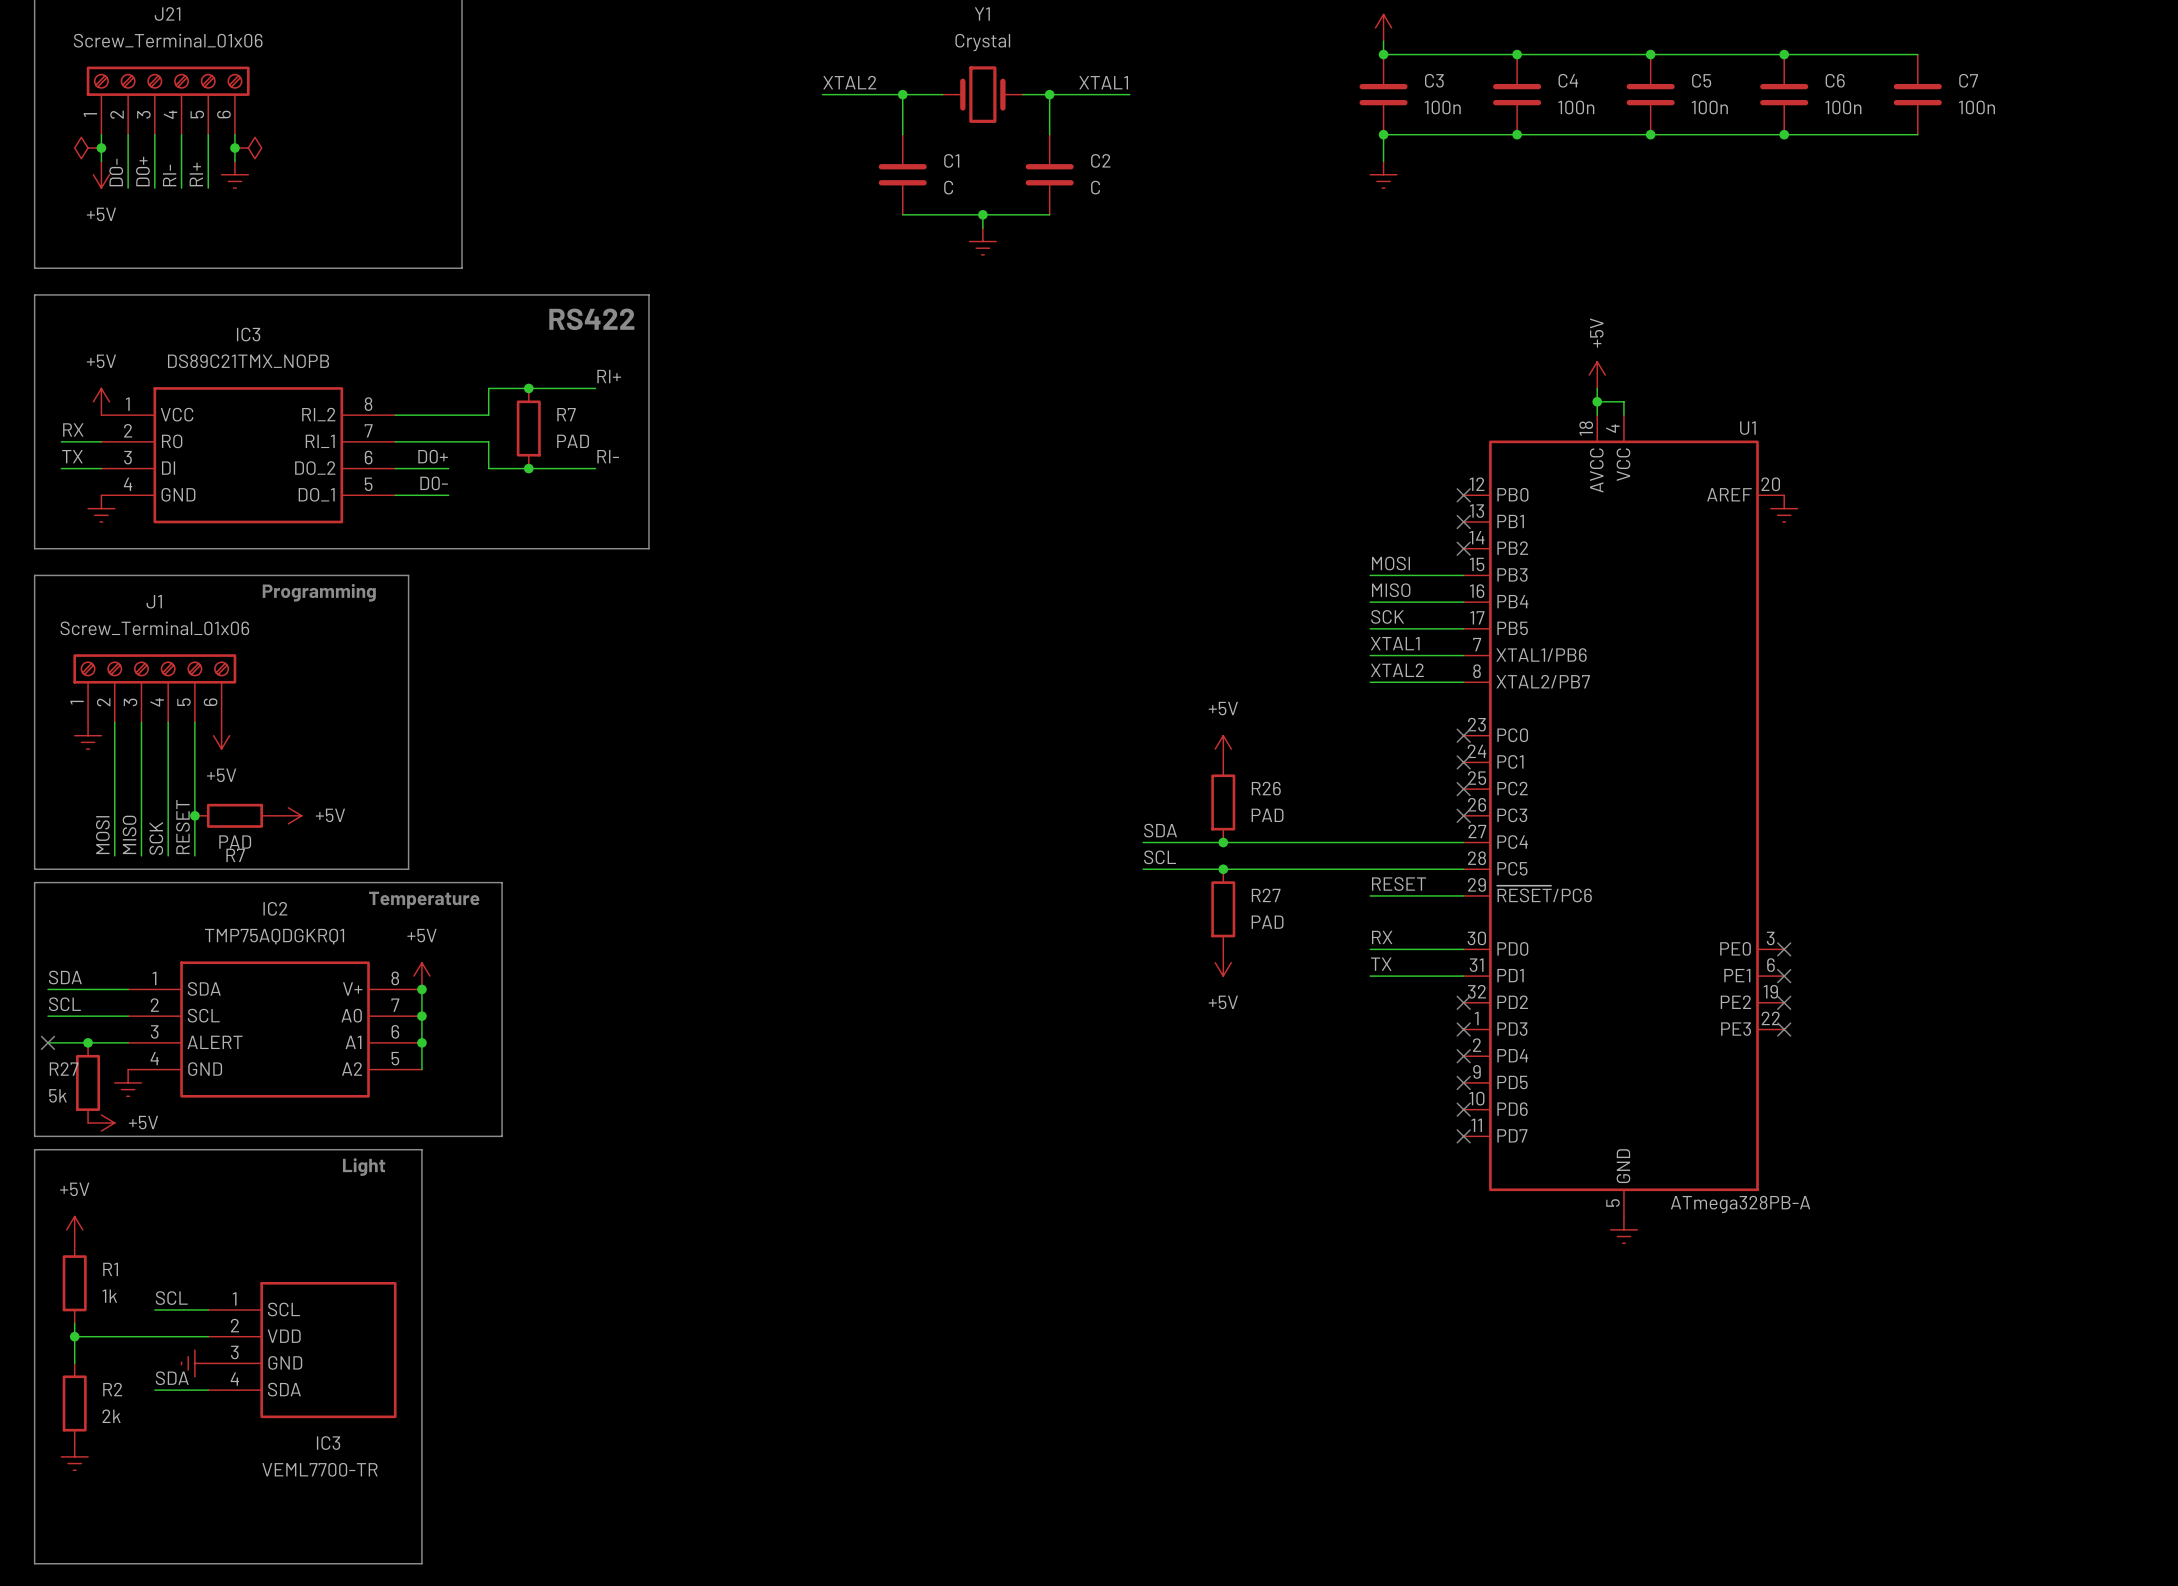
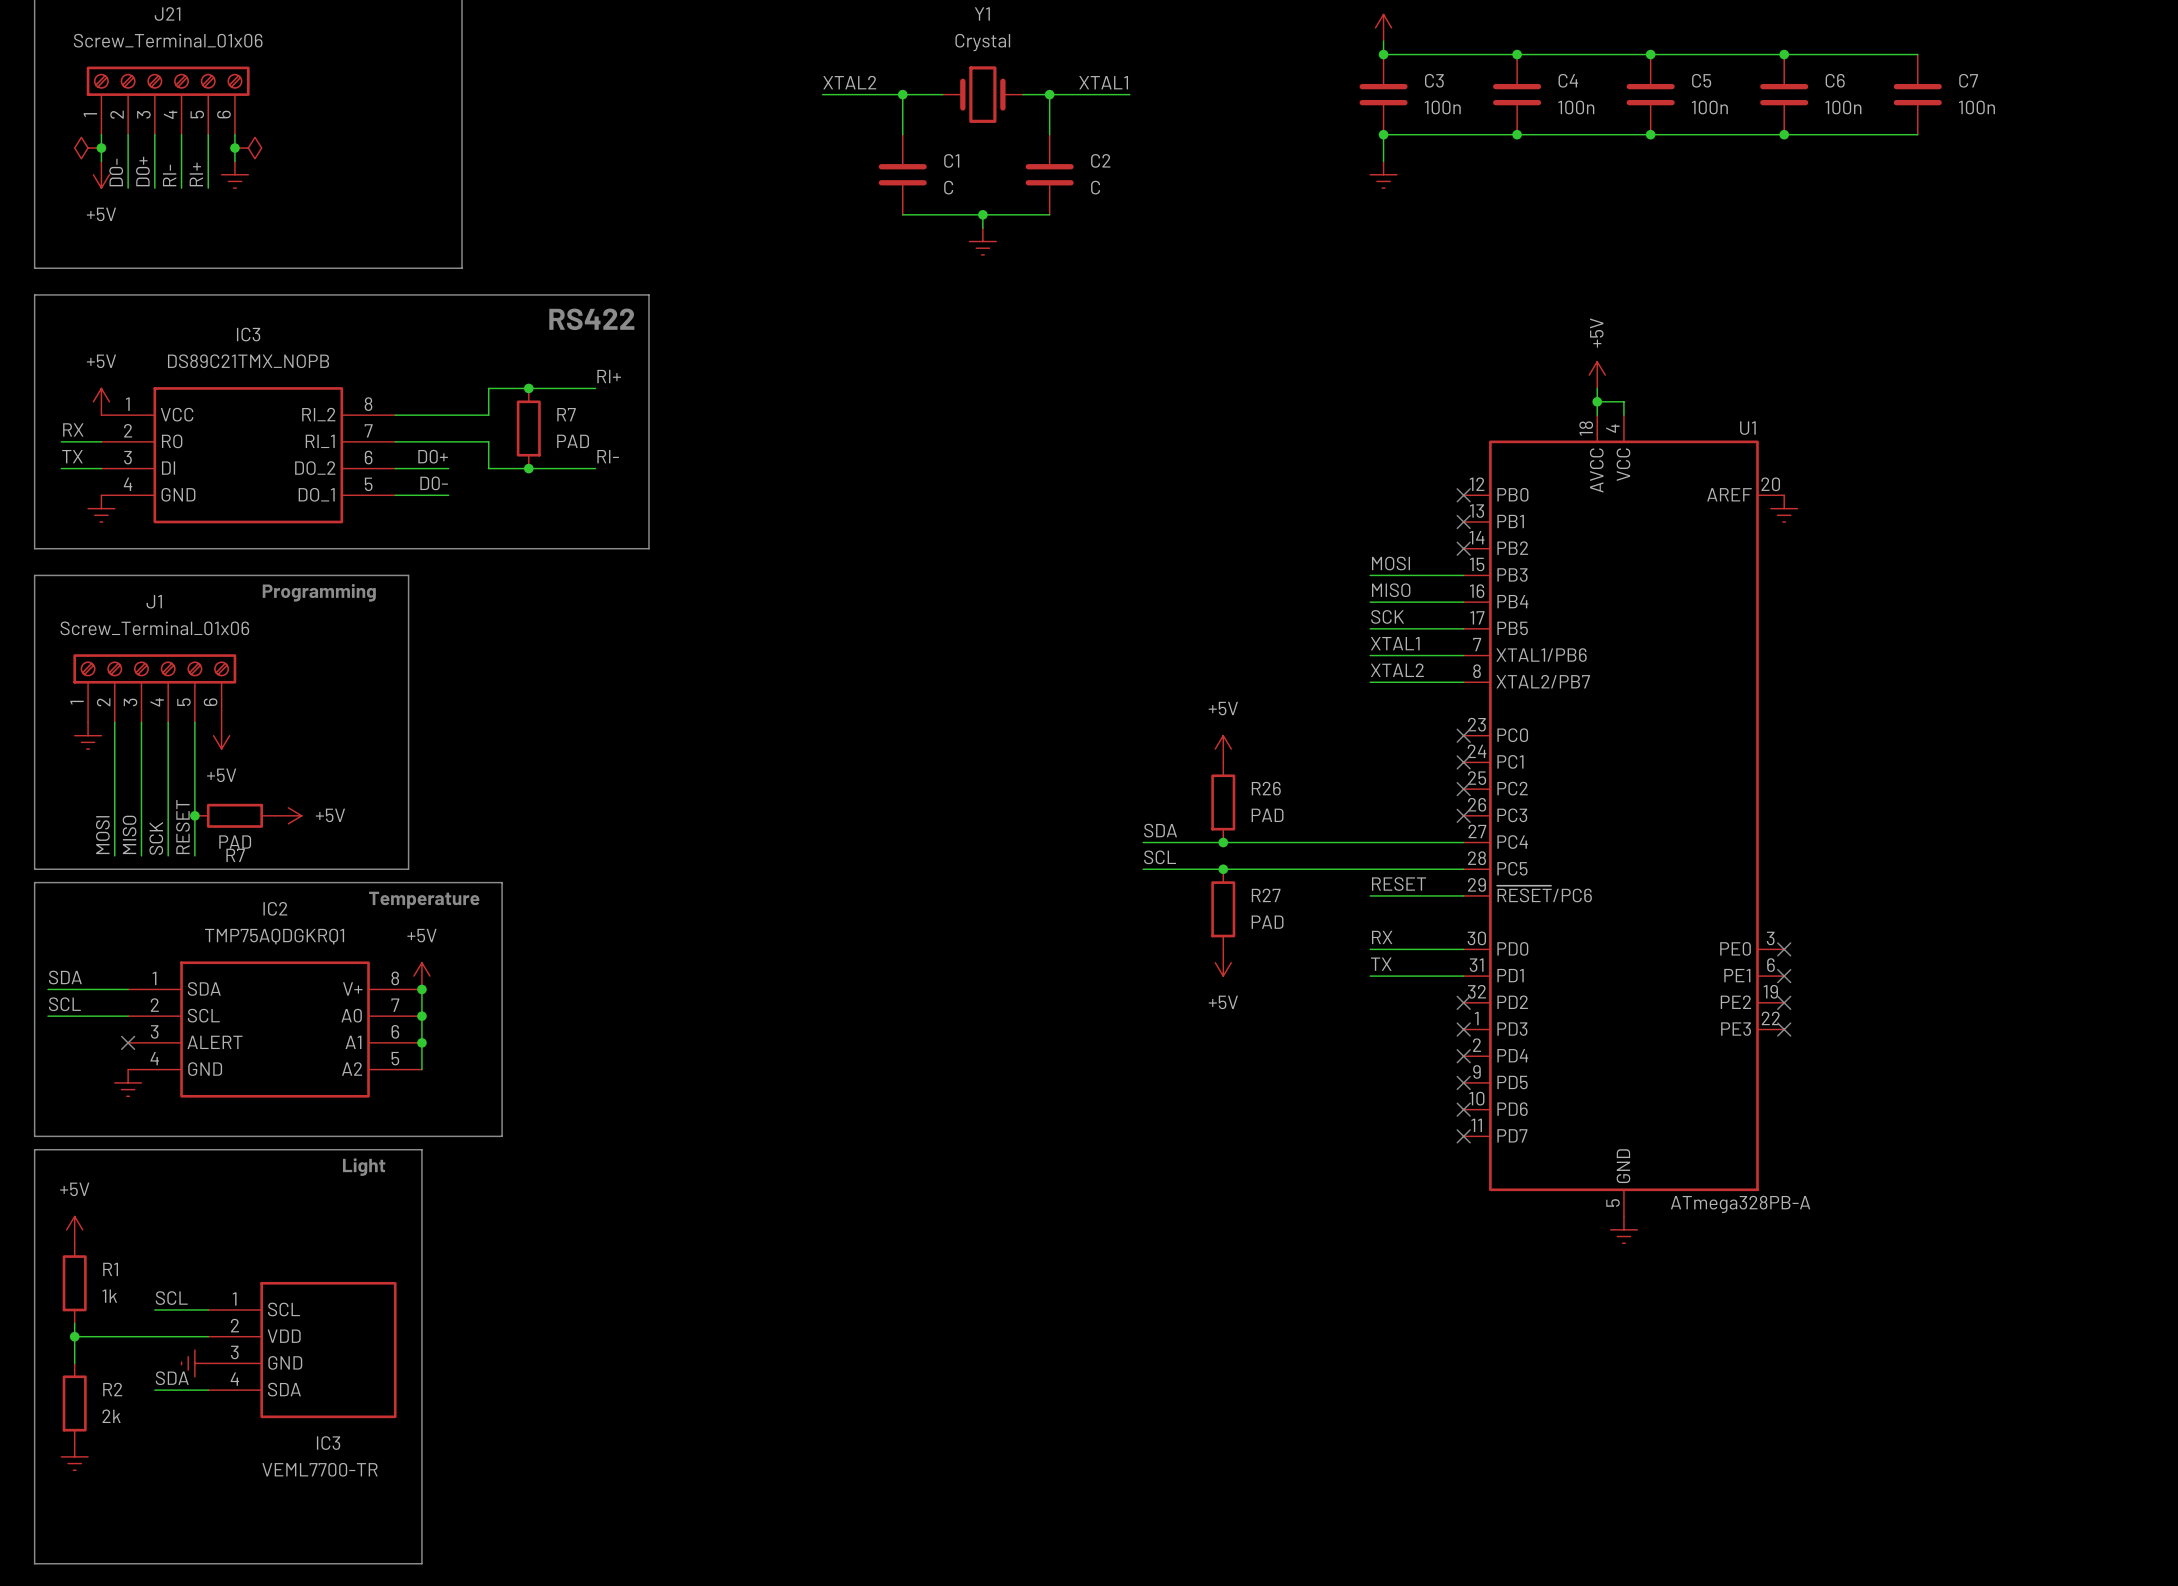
wire: (47, 1042) (128, 1042) -> none
no-connect mark: (47, 1042) -> none
junction: (88, 1042) -> none
no-connect mark: none -> (128, 1042)
R27: 5k (88, 1082) -> none
power symbol: +5V (101, 1123) -> none

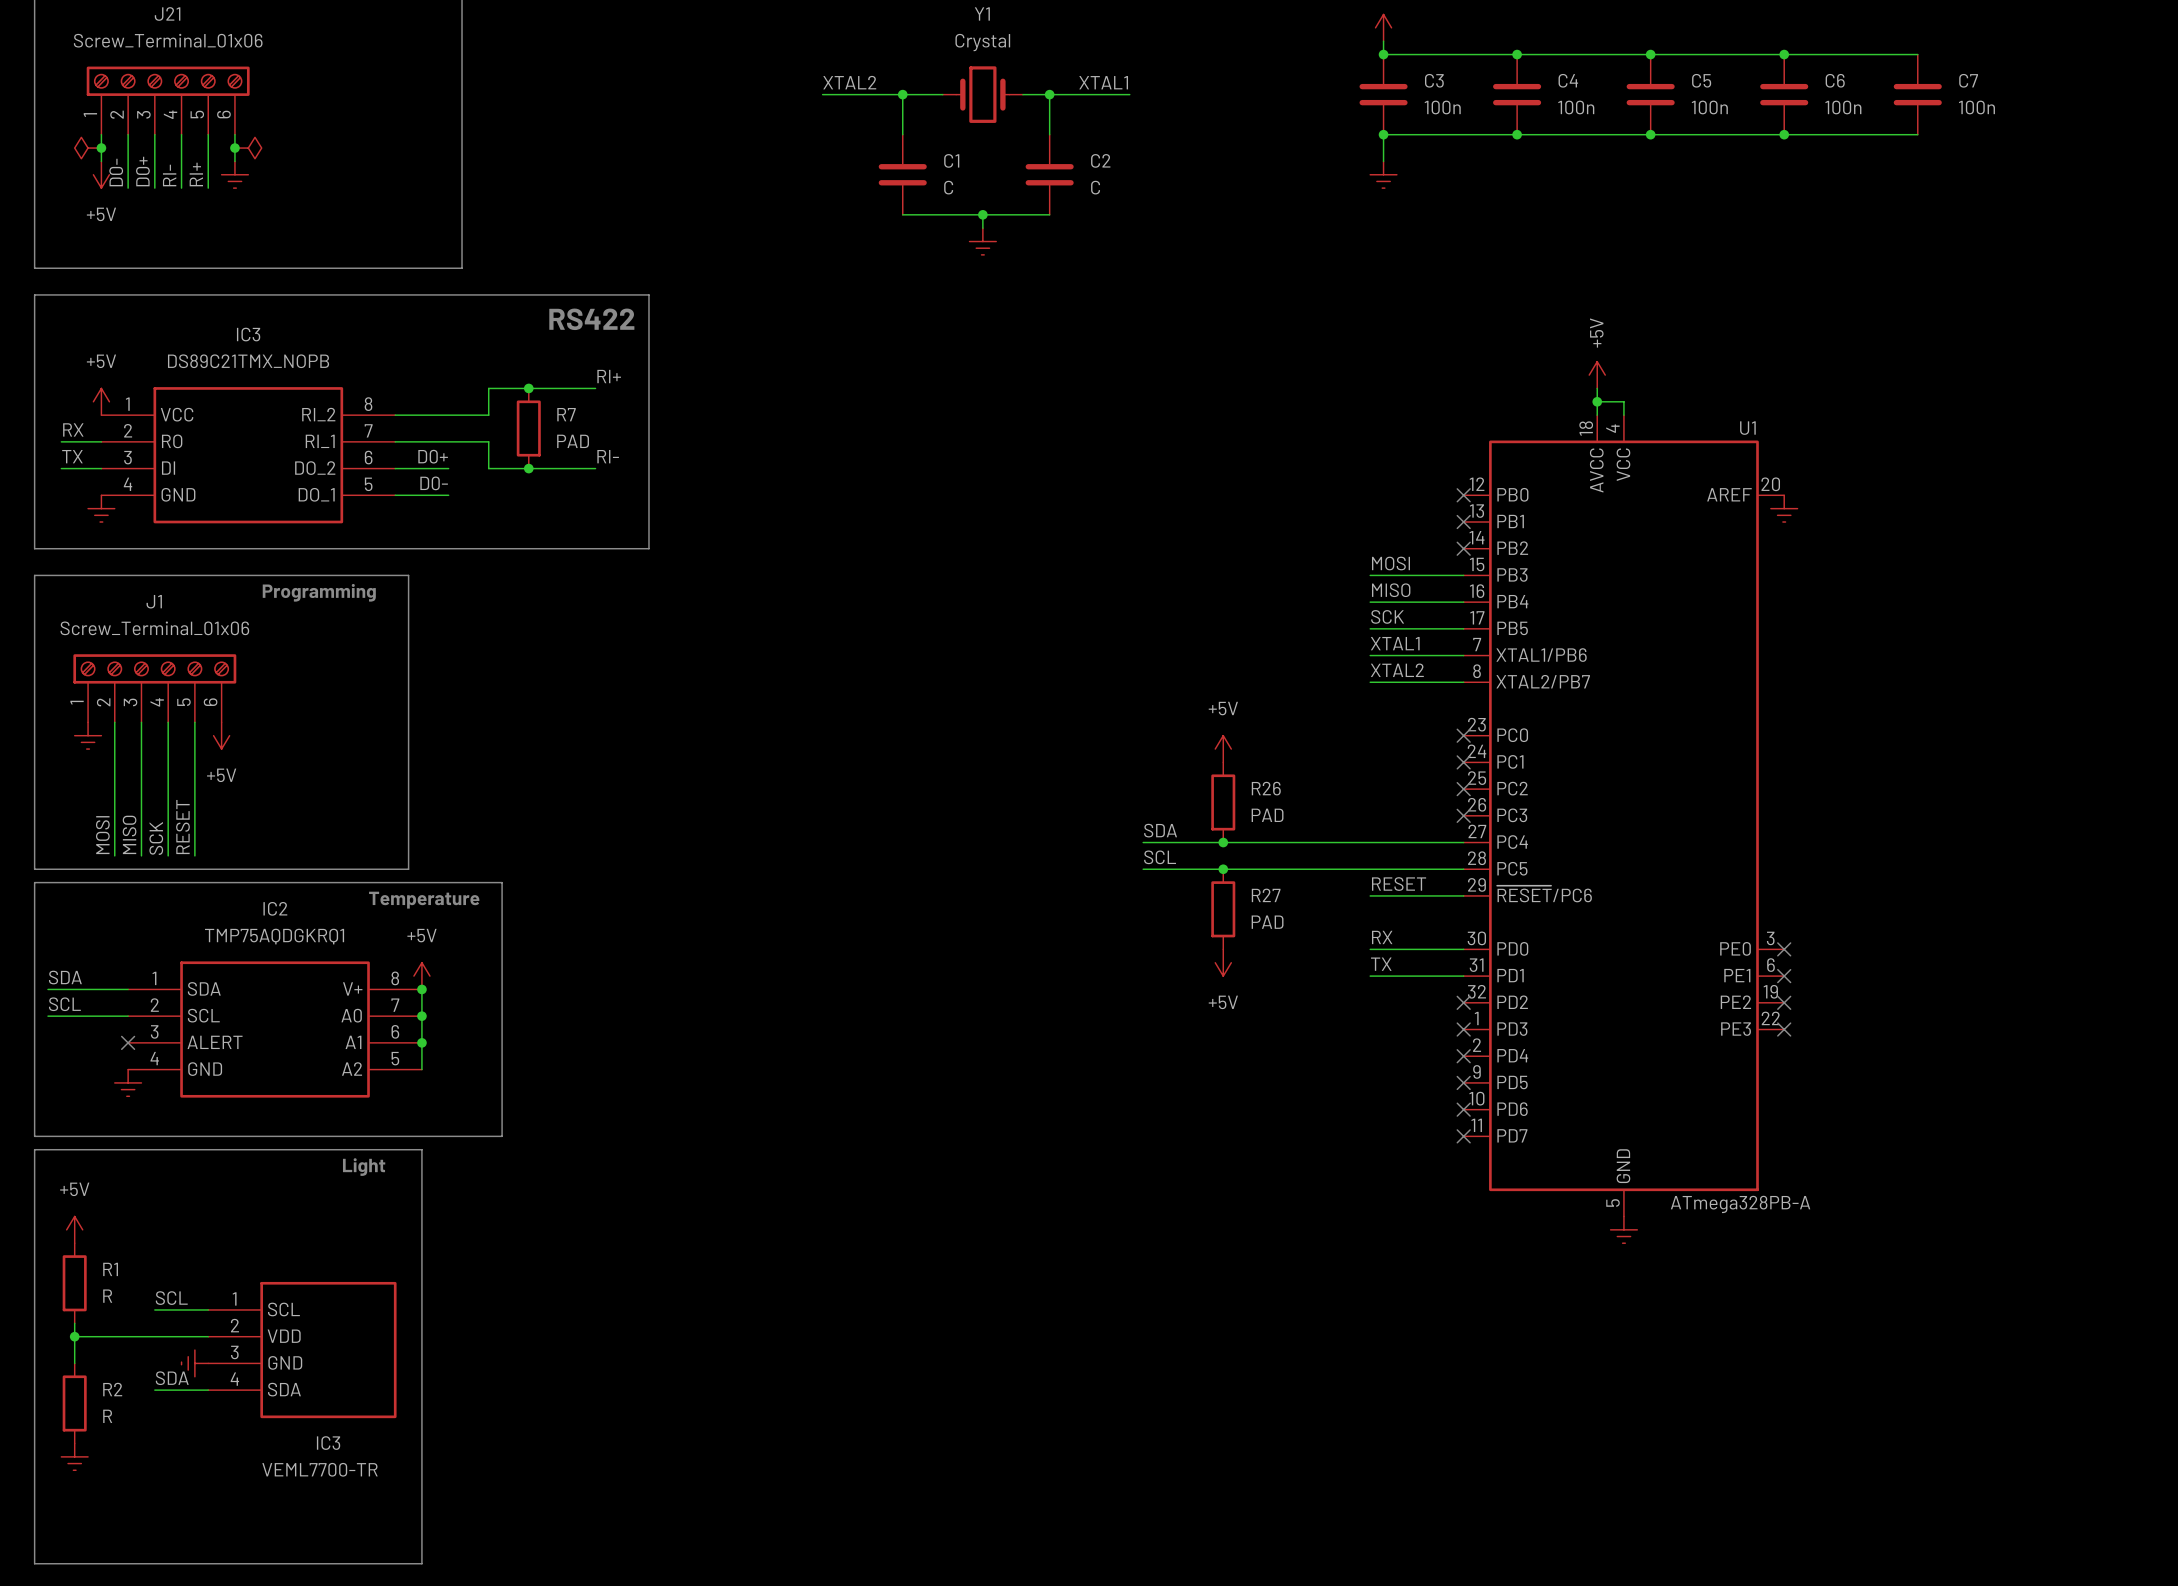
junction: (194, 815) -> none
R7: PAD (234, 815) -> none
power symbol: +5V (288, 815) -> none
R1 value: 1k (109, 1296) -> R (107, 1296)
R2 value: 2k (111, 1416) -> R (107, 1416)

